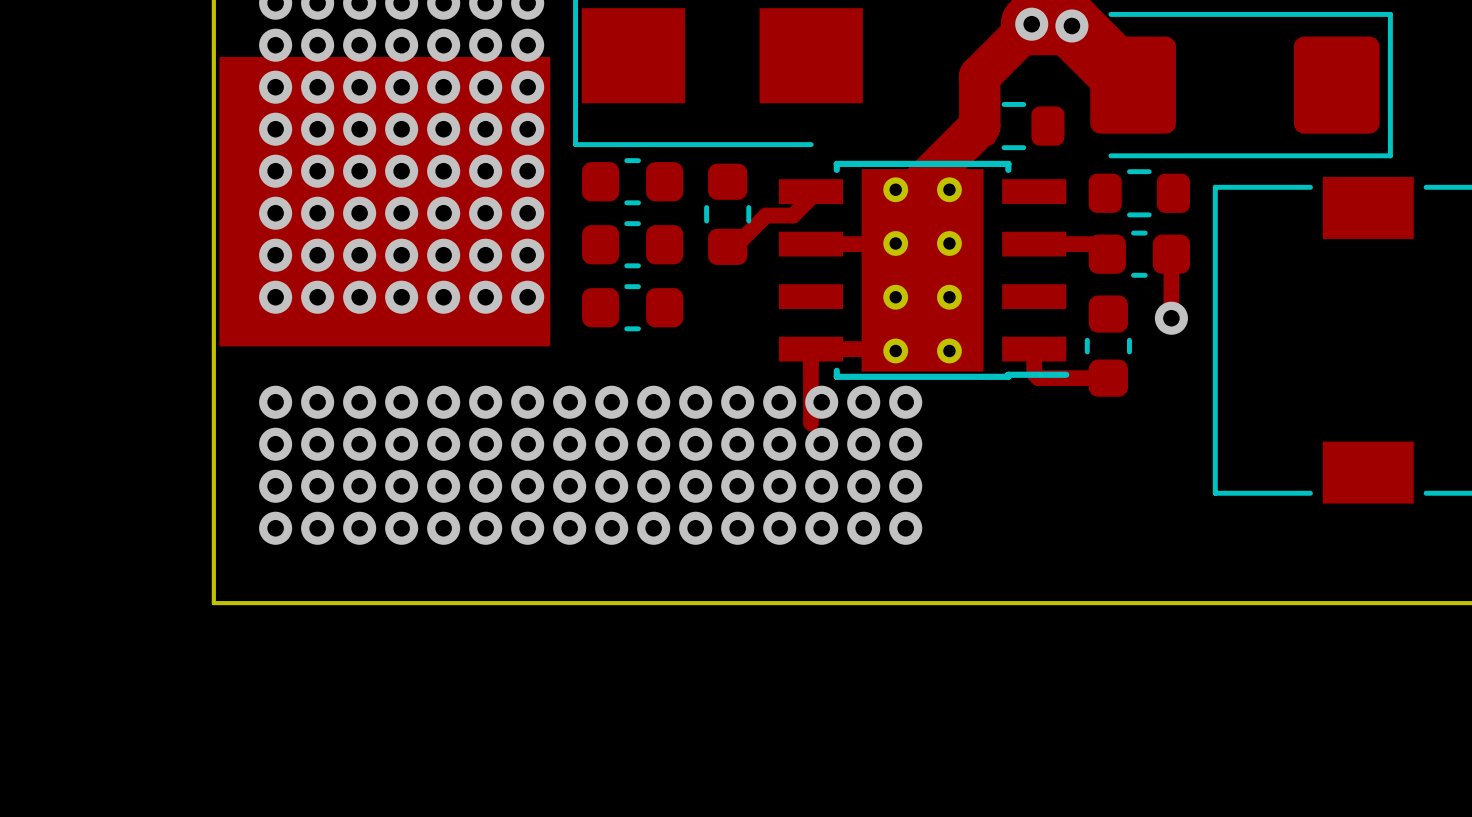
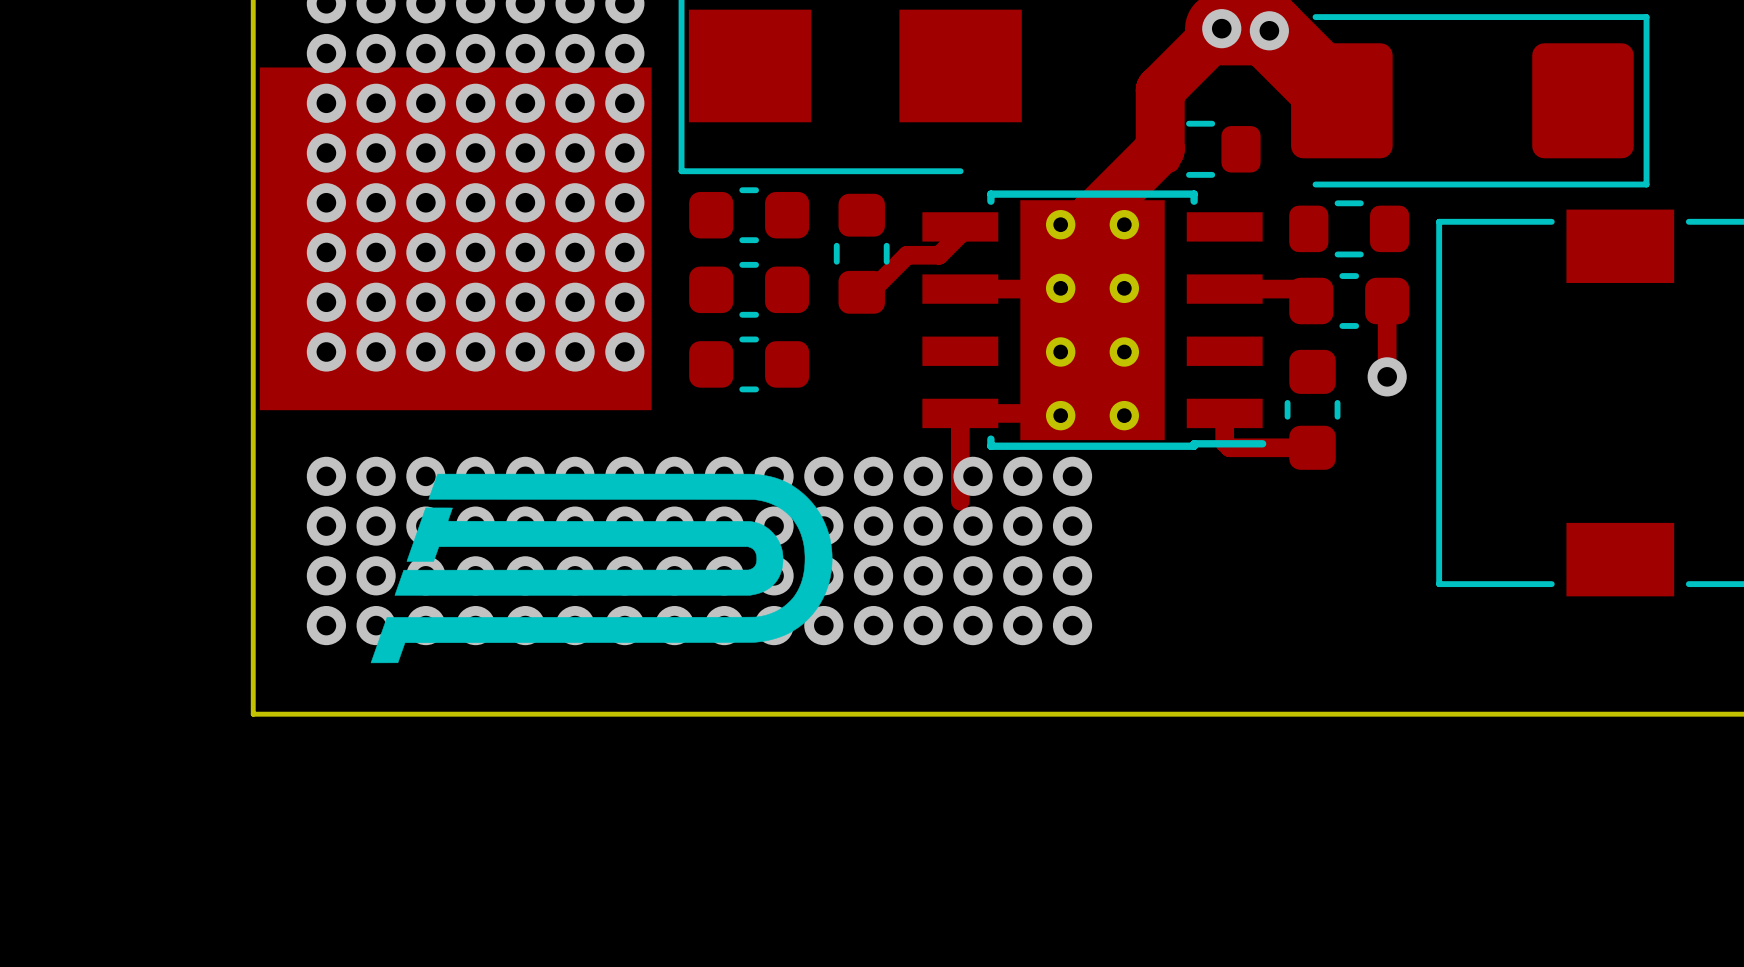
drawing: none -> [370, 473, 833, 664]

